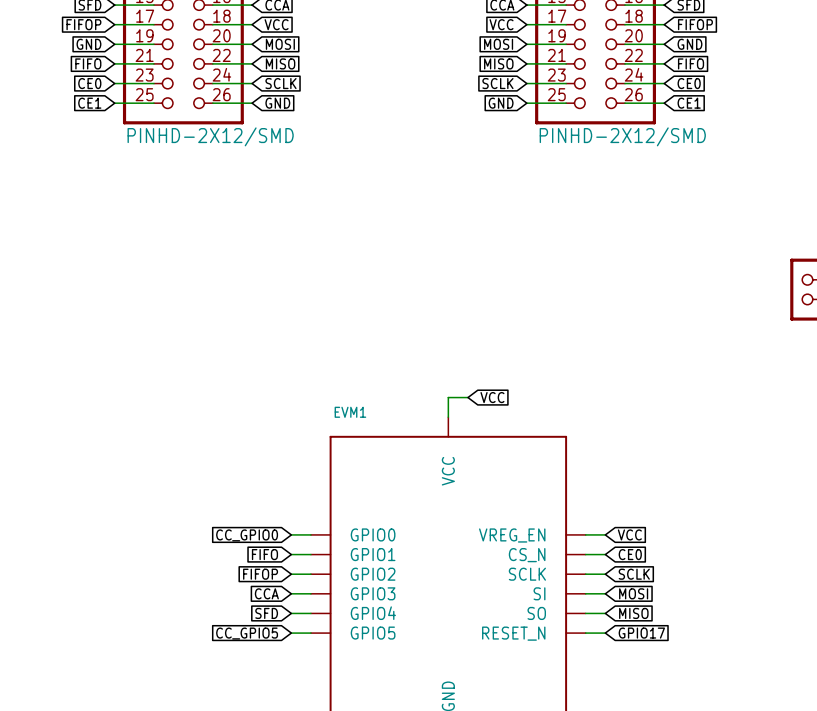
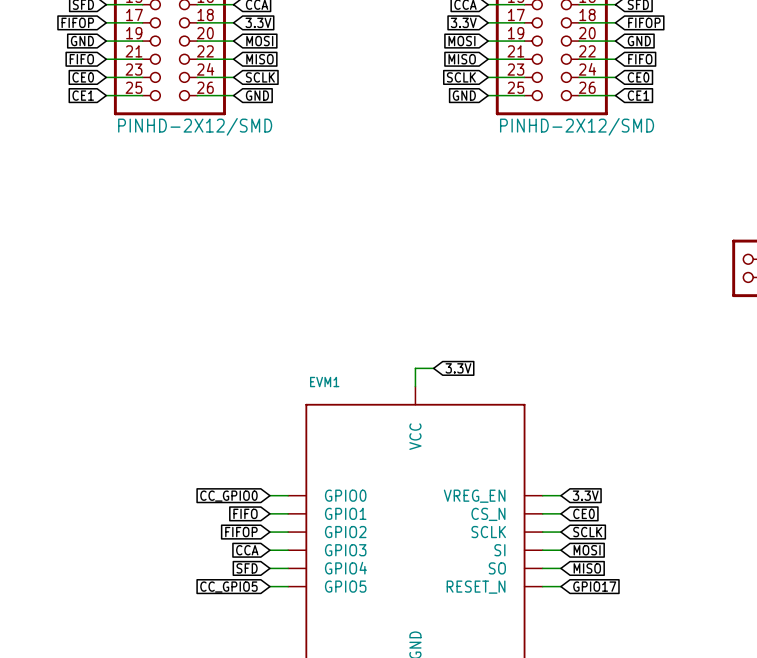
global label: VCC (276, 24) -> 3.3V (258, 22)
global label: VCC (501, 24) -> 3.3V (463, 22)
global label: VCC (492, 397) -> 3.3V (458, 368)
global label: VCC (629, 534) -> 3.3V (585, 495)

